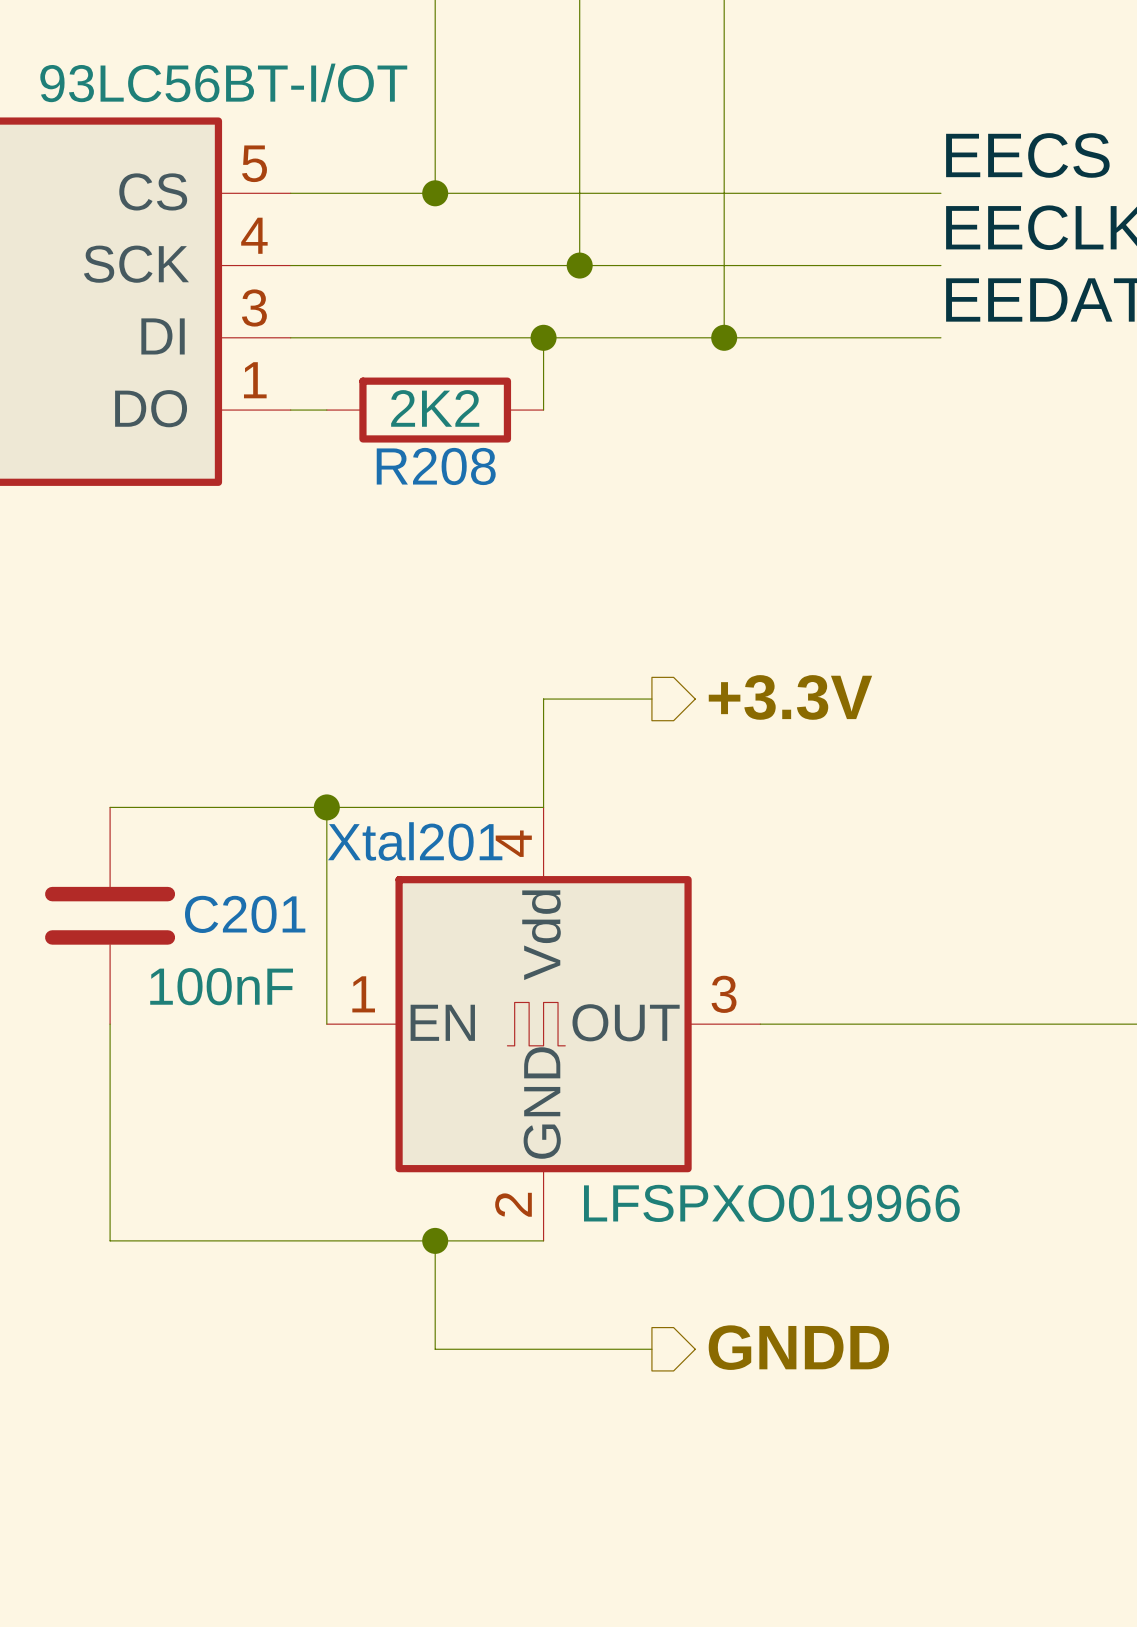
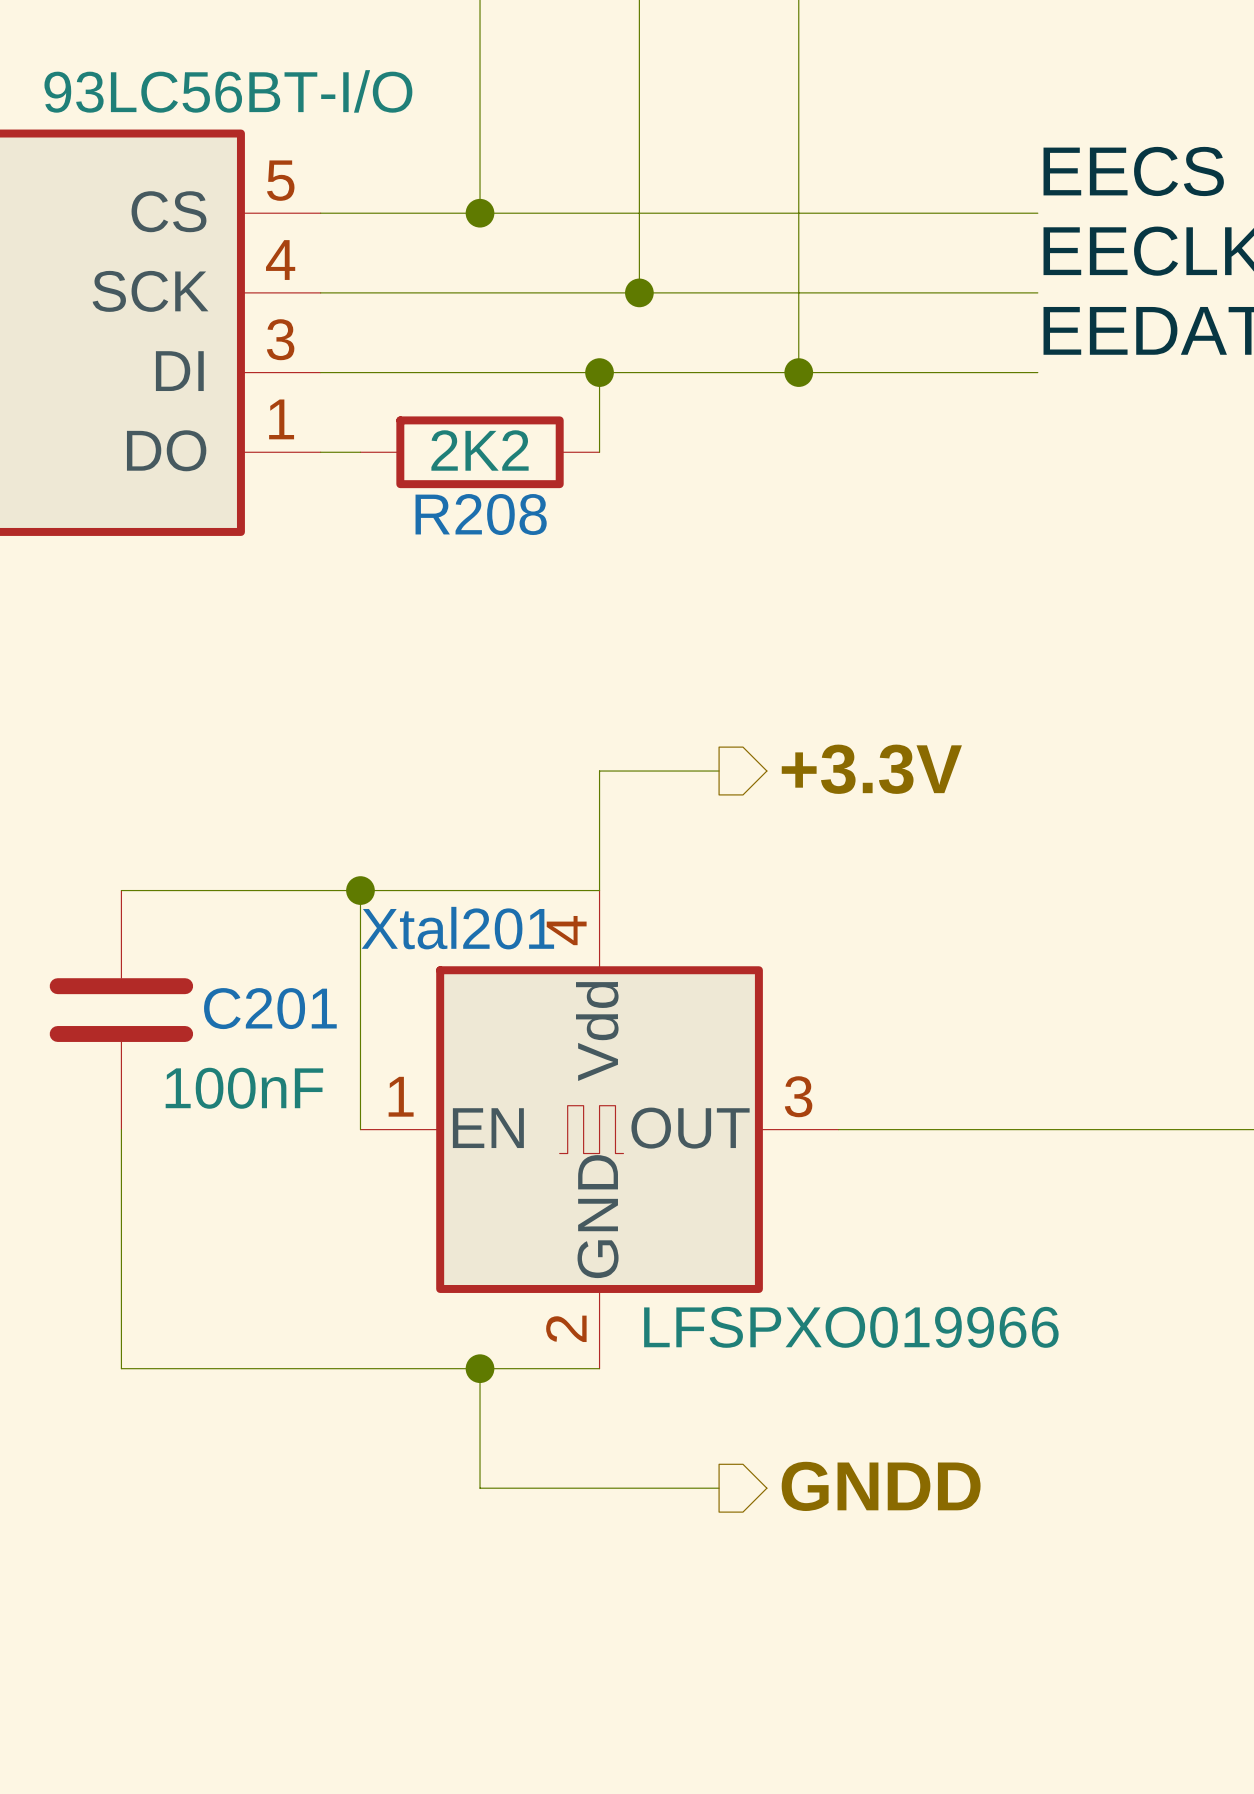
part value: 93LC56BT-I/OT (223, 82) -> 93LC56BT-I/O (228, 91)

